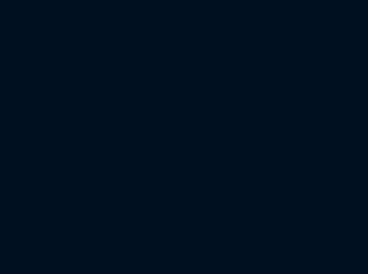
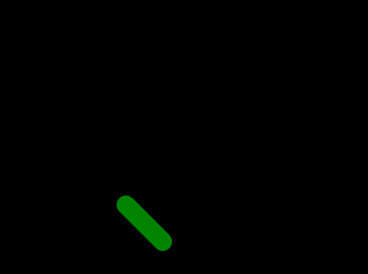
bottom track: none -> (125, 204) (162, 241)

